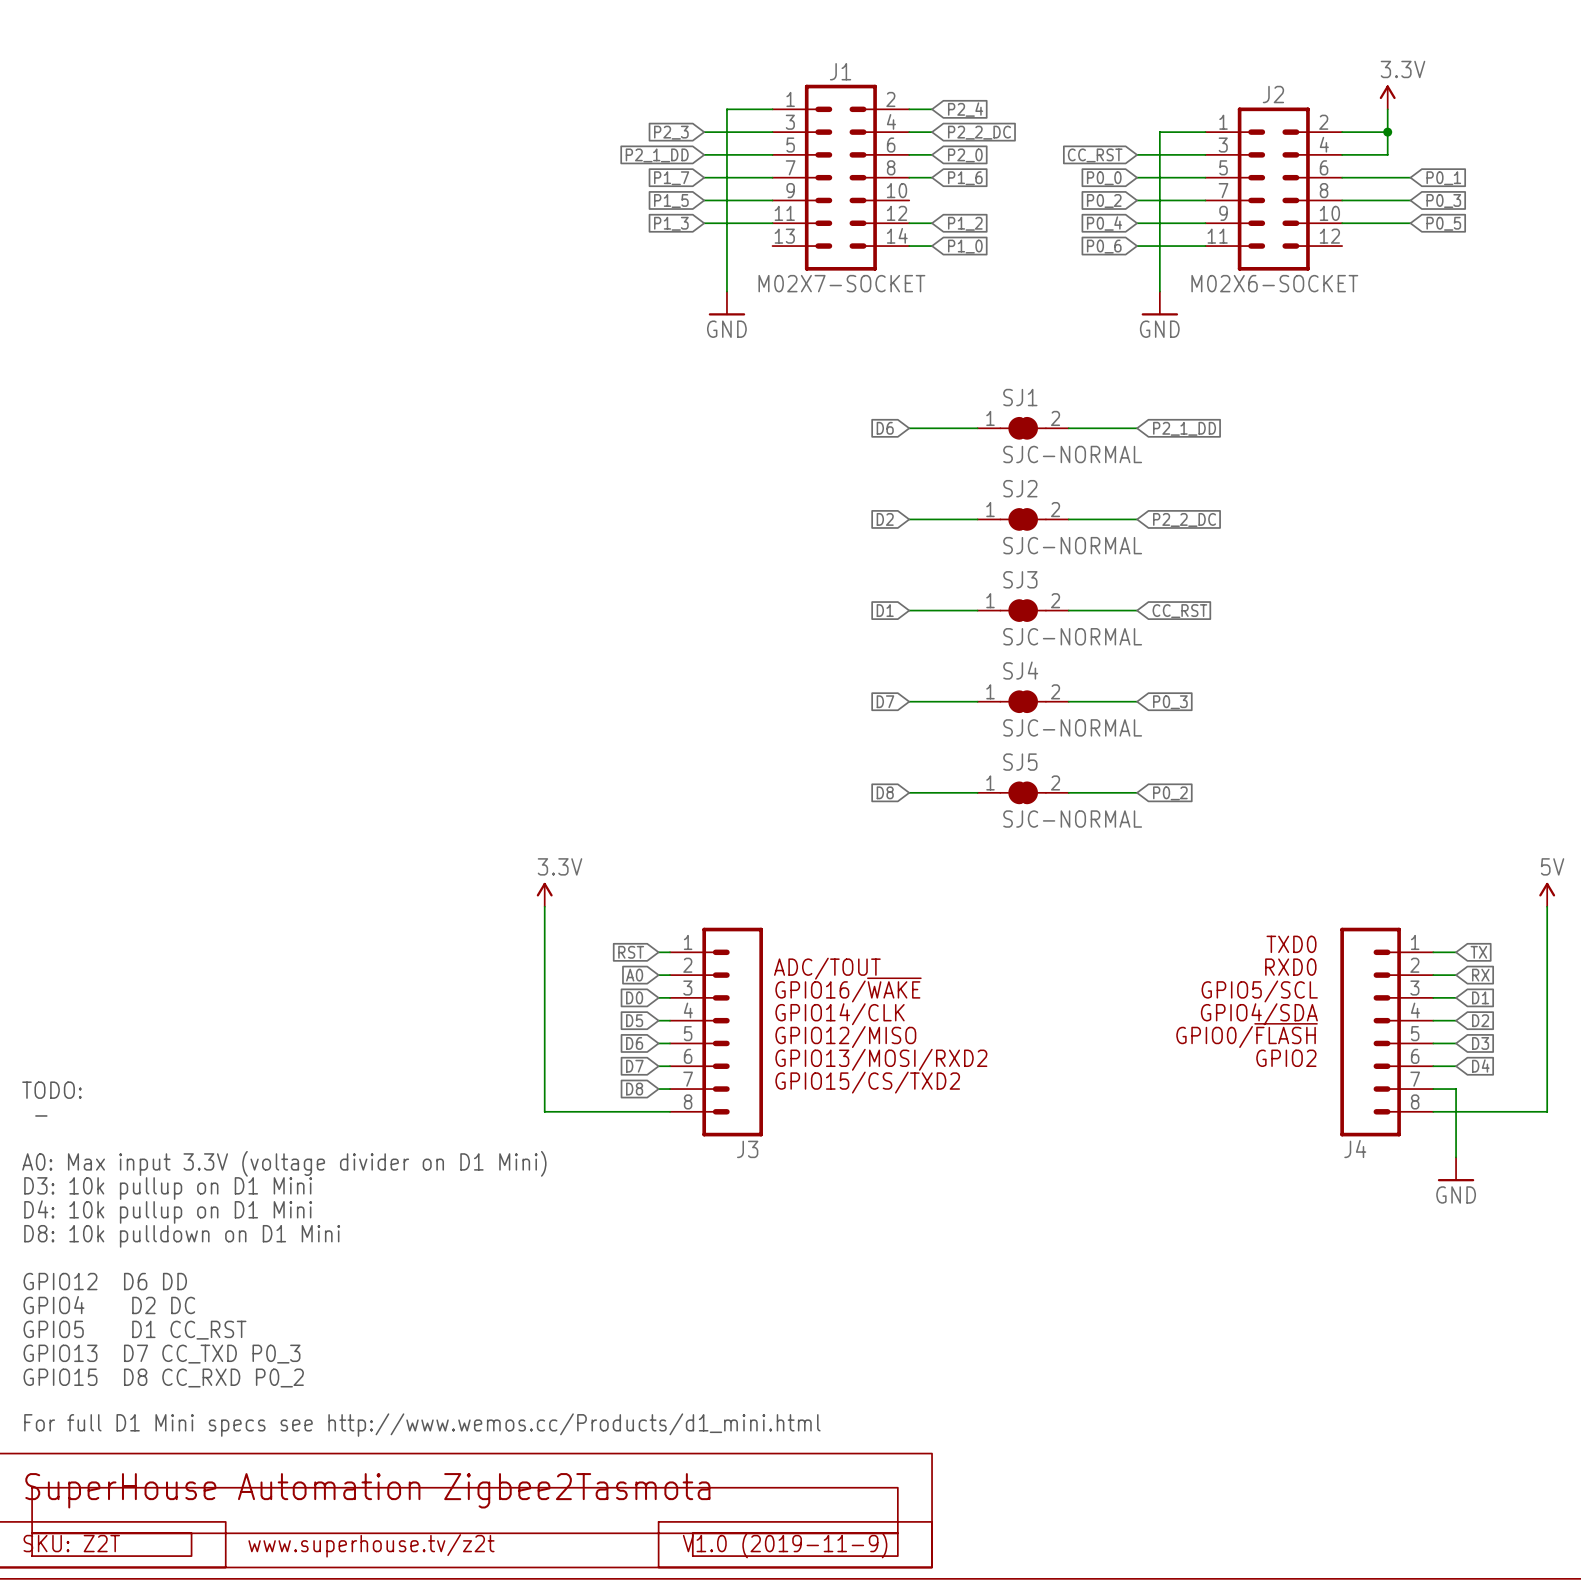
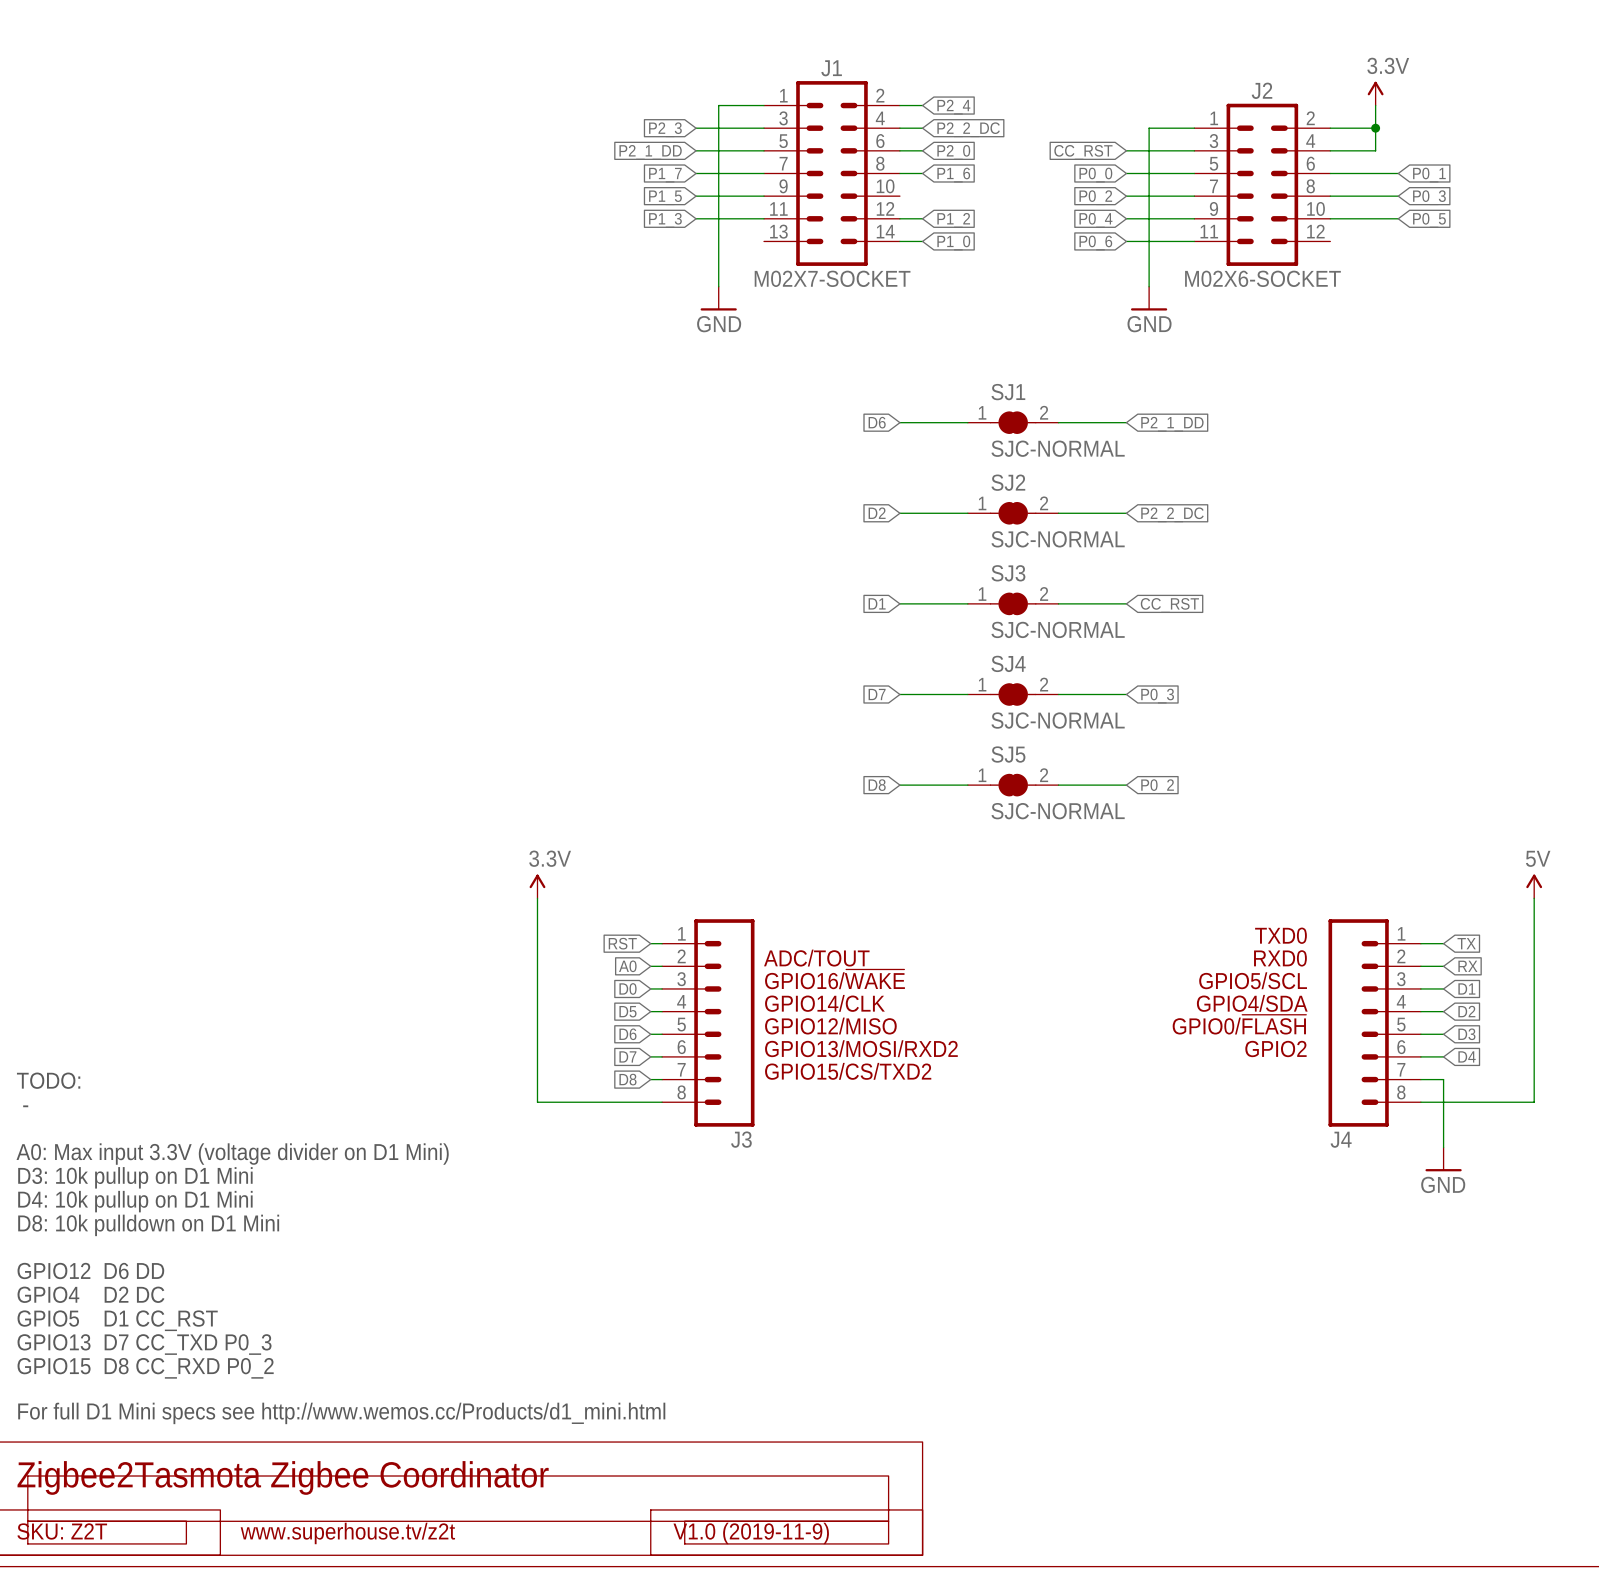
text: SuperHouse Automation Zigbee2Tasmota (367, 1490) -> Zigbee2Tasmota Zigbee Coordinator (283, 1477)

